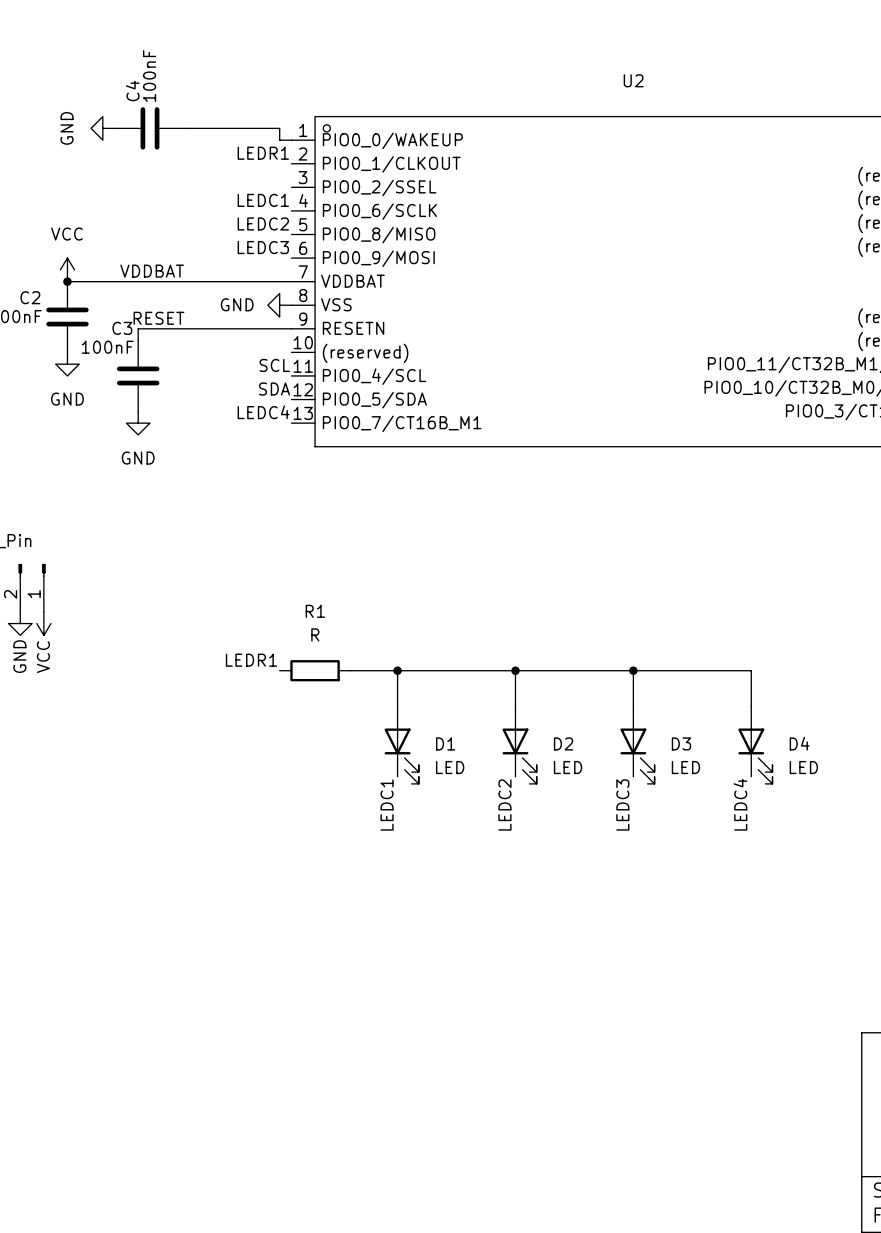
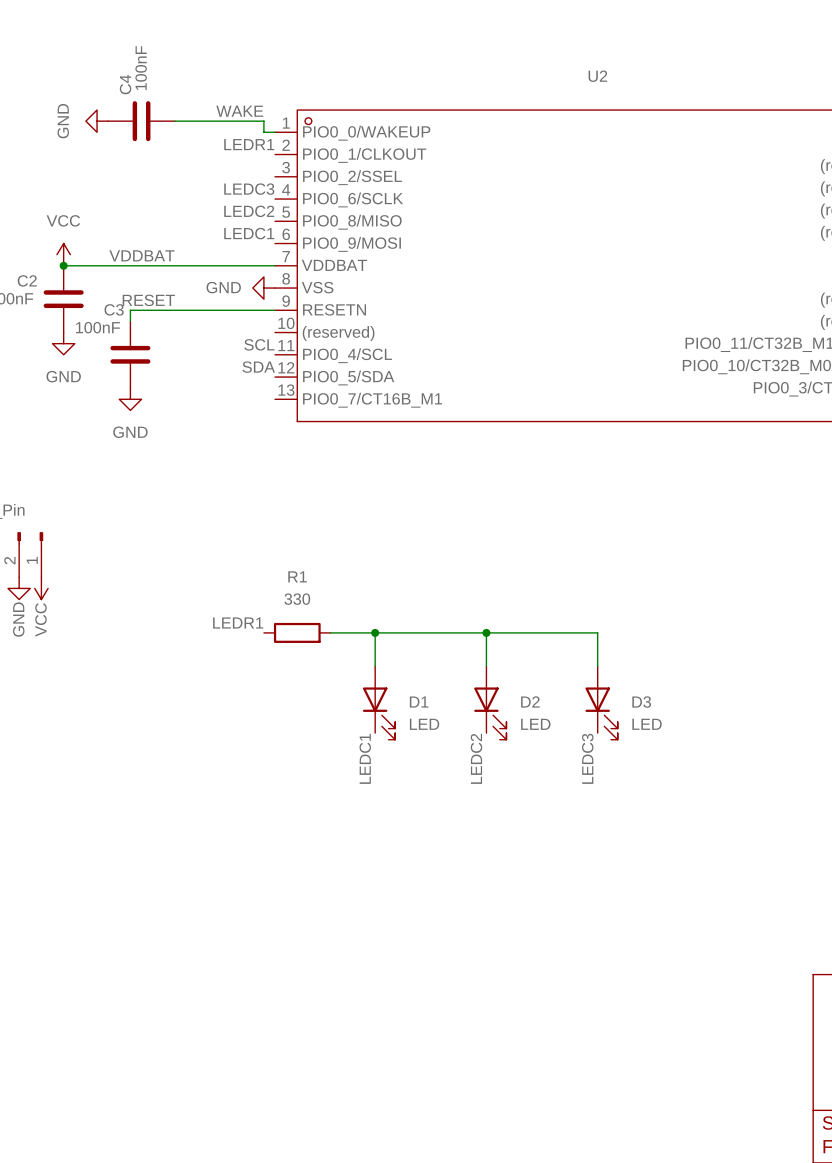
label: none -> WAKE (239, 111)
label: LEDC1 (263, 200) -> LEDC3 (249, 189)
label: LEDC3 (263, 247) -> LEDC1 (249, 233)
label: LEDC4 (263, 412) -> none
R1 value: R (315, 634) -> 330 (297, 599)
wire: (633, 670) (751, 670) (751, 706) -> none
junction: (633, 670) -> none
D4: LED (755, 744) -> none
label: LEDC4 (740, 804) -> none

